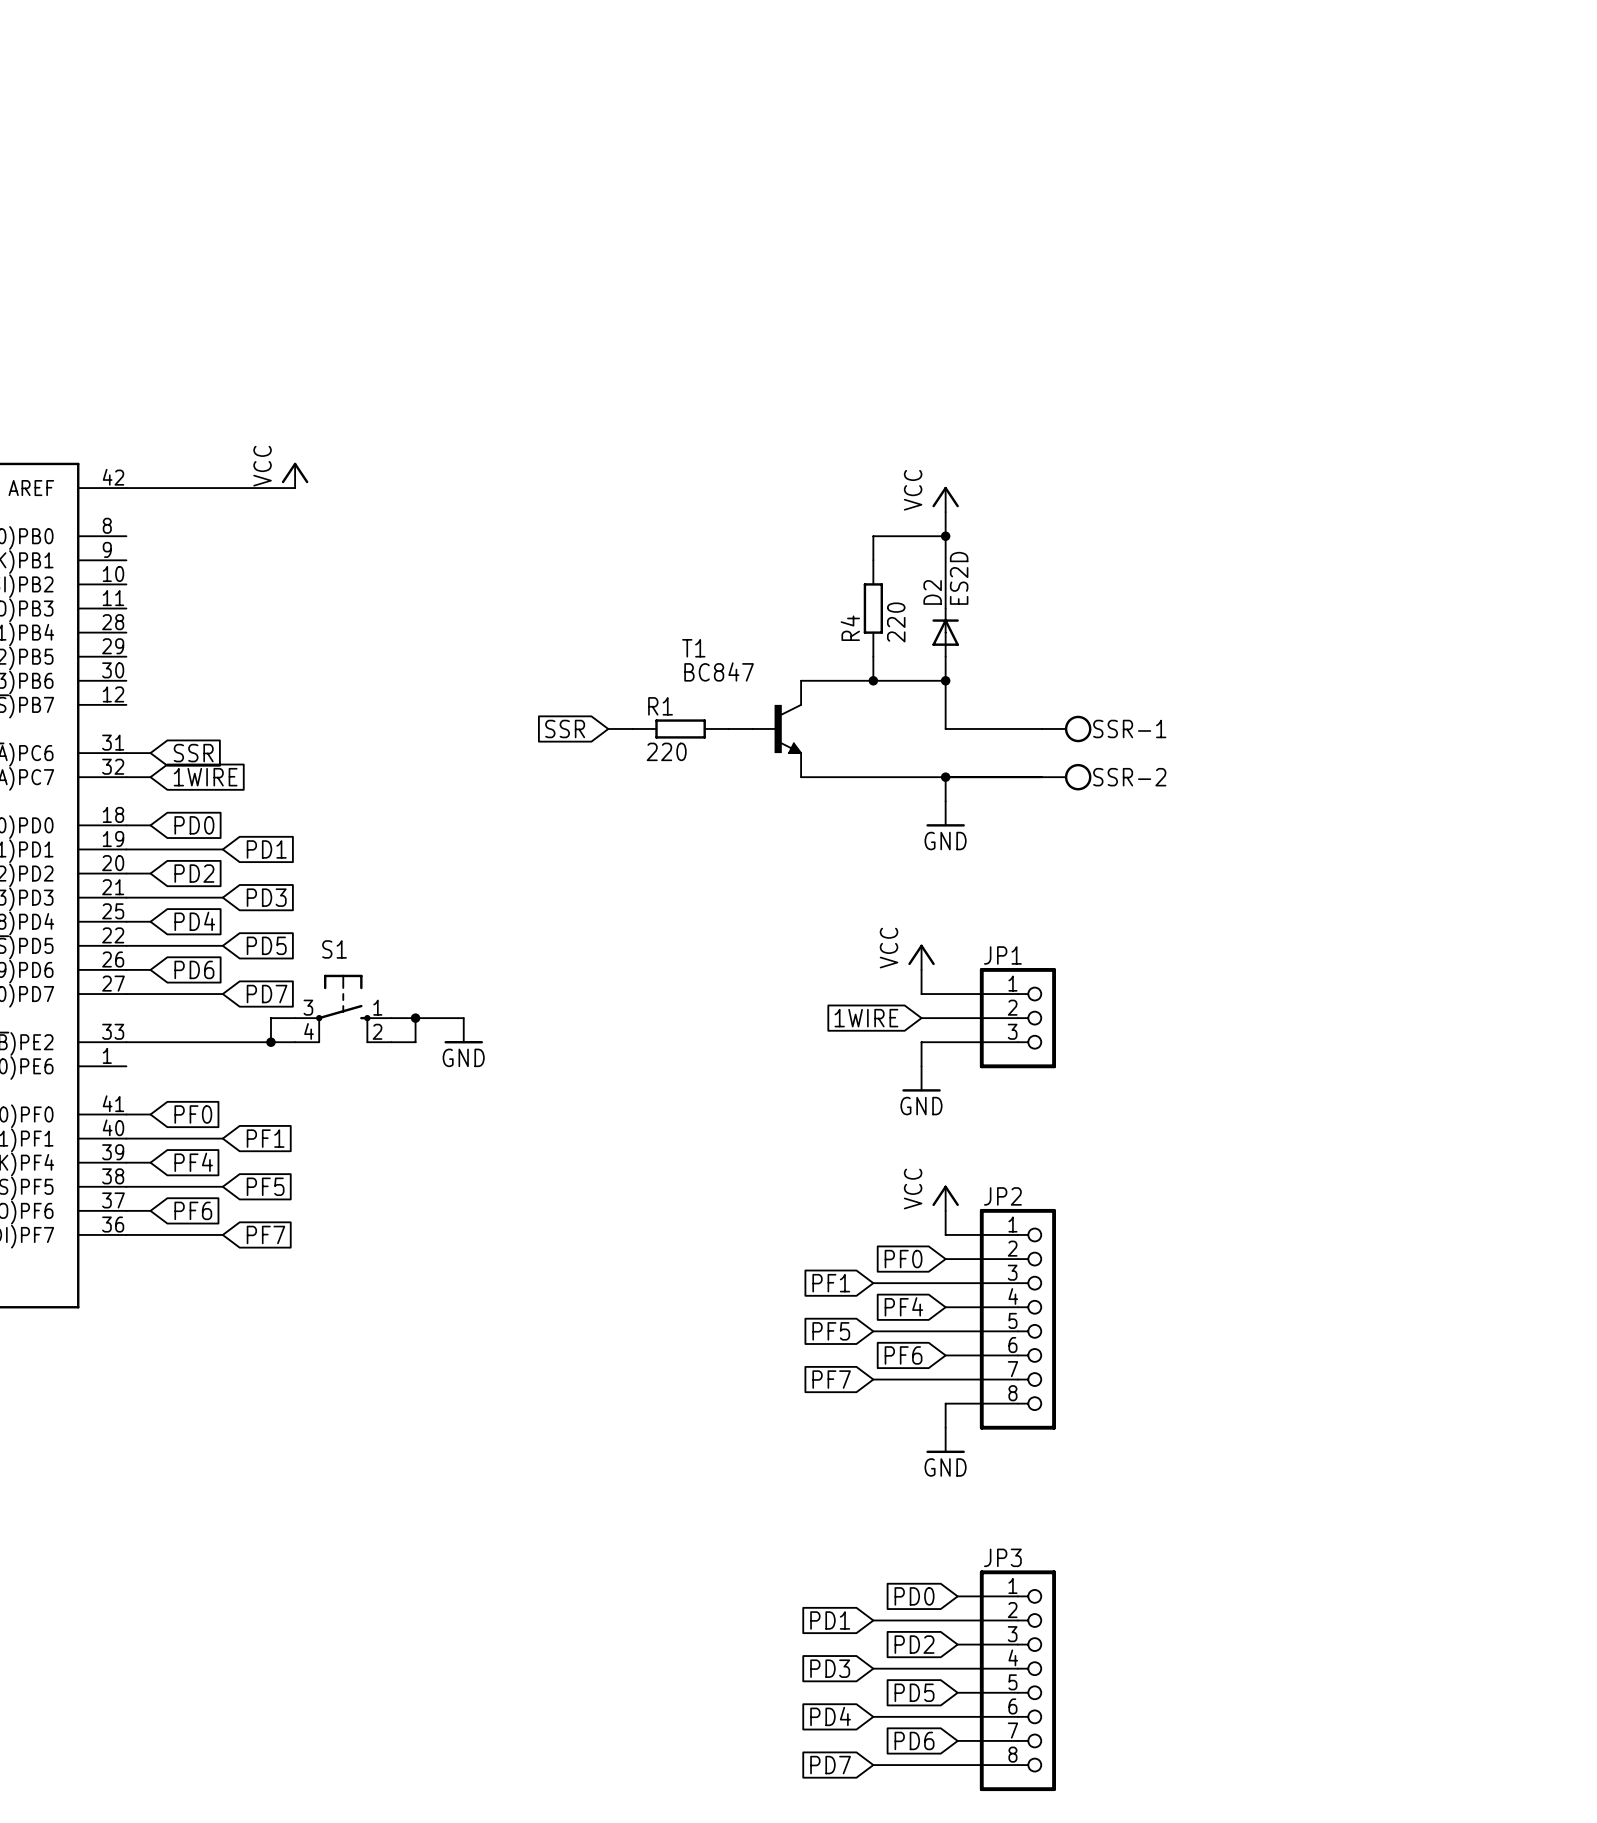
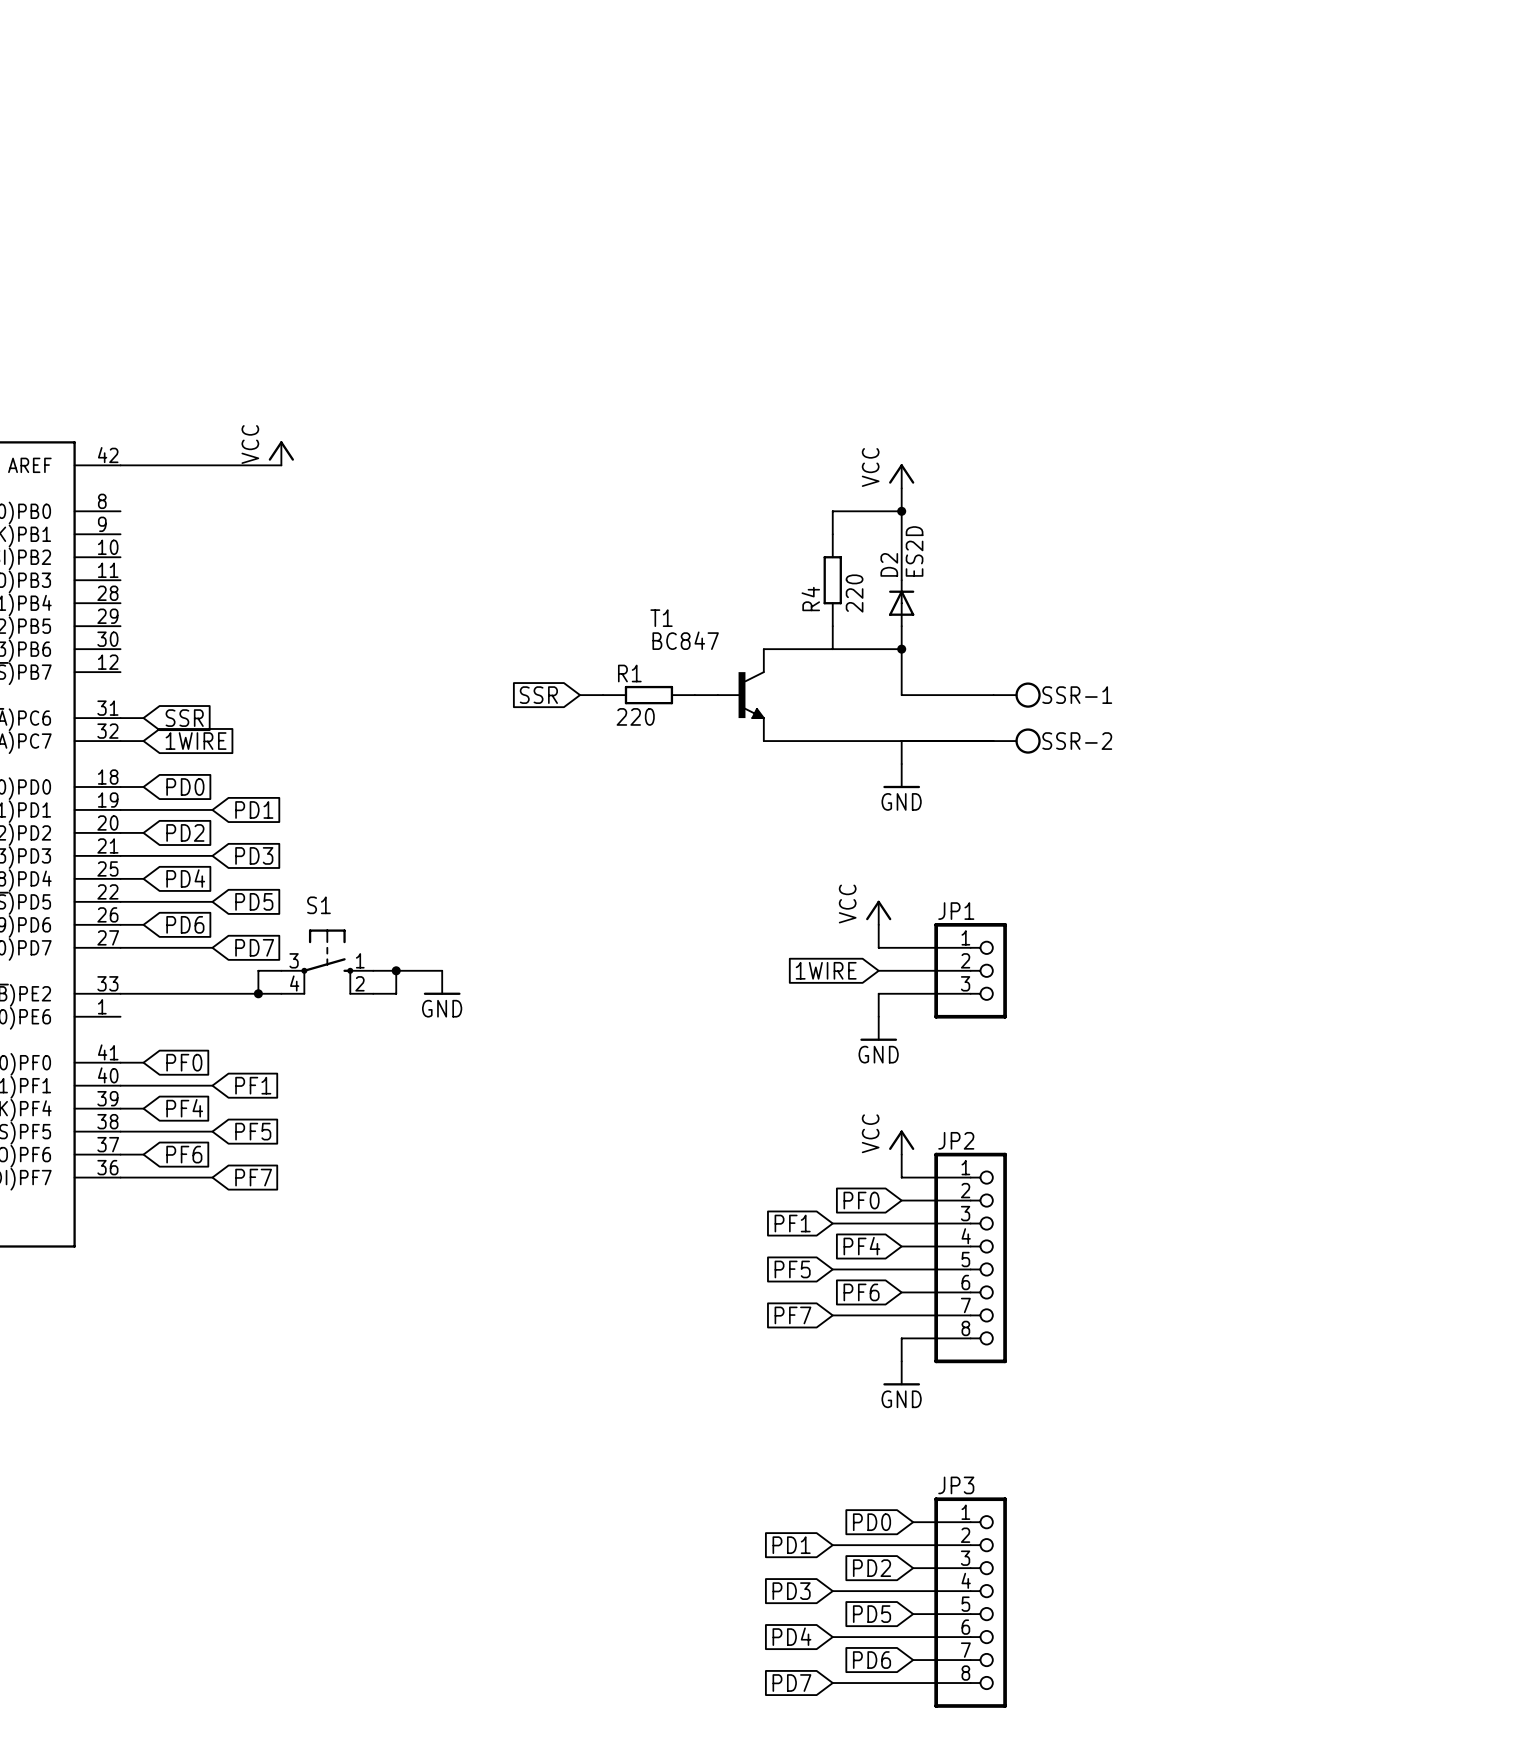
junction: (873, 680) -> none
junction: (945, 777) -> none

